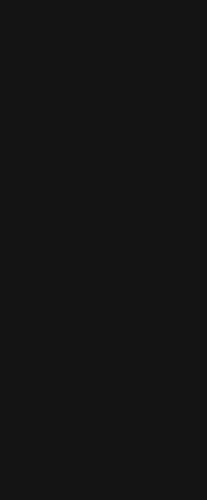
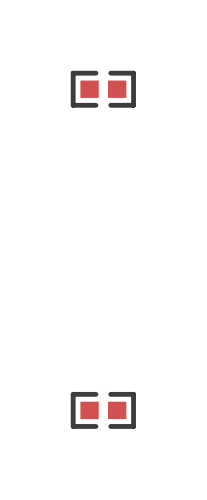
part: none -> (103, 89)
part: none -> (103, 410)

